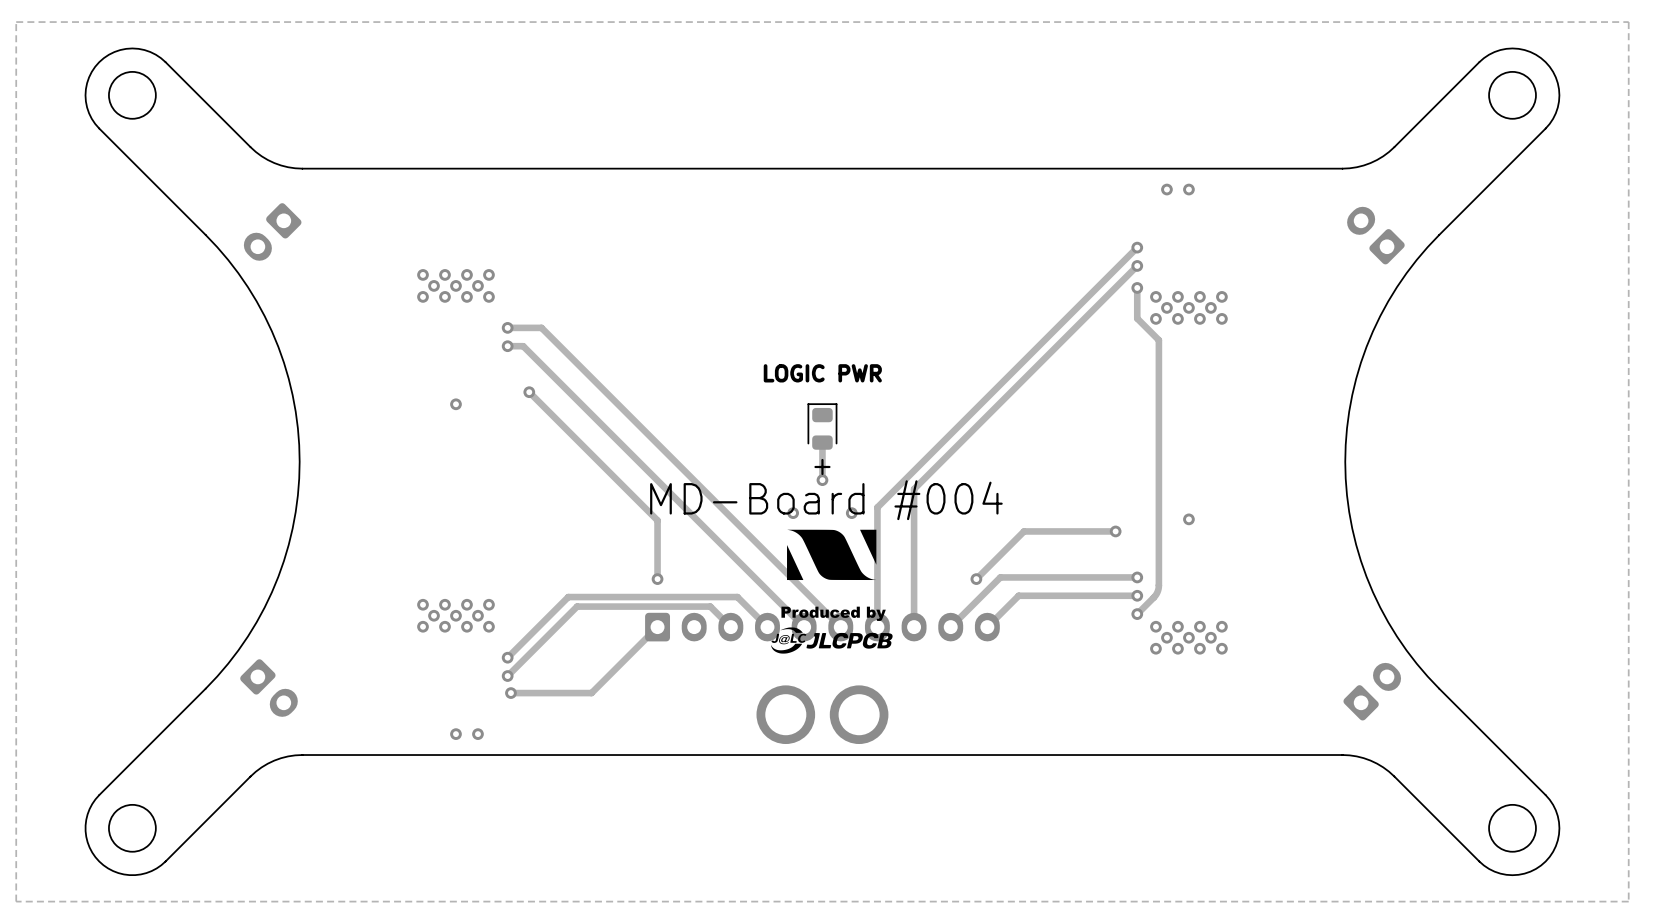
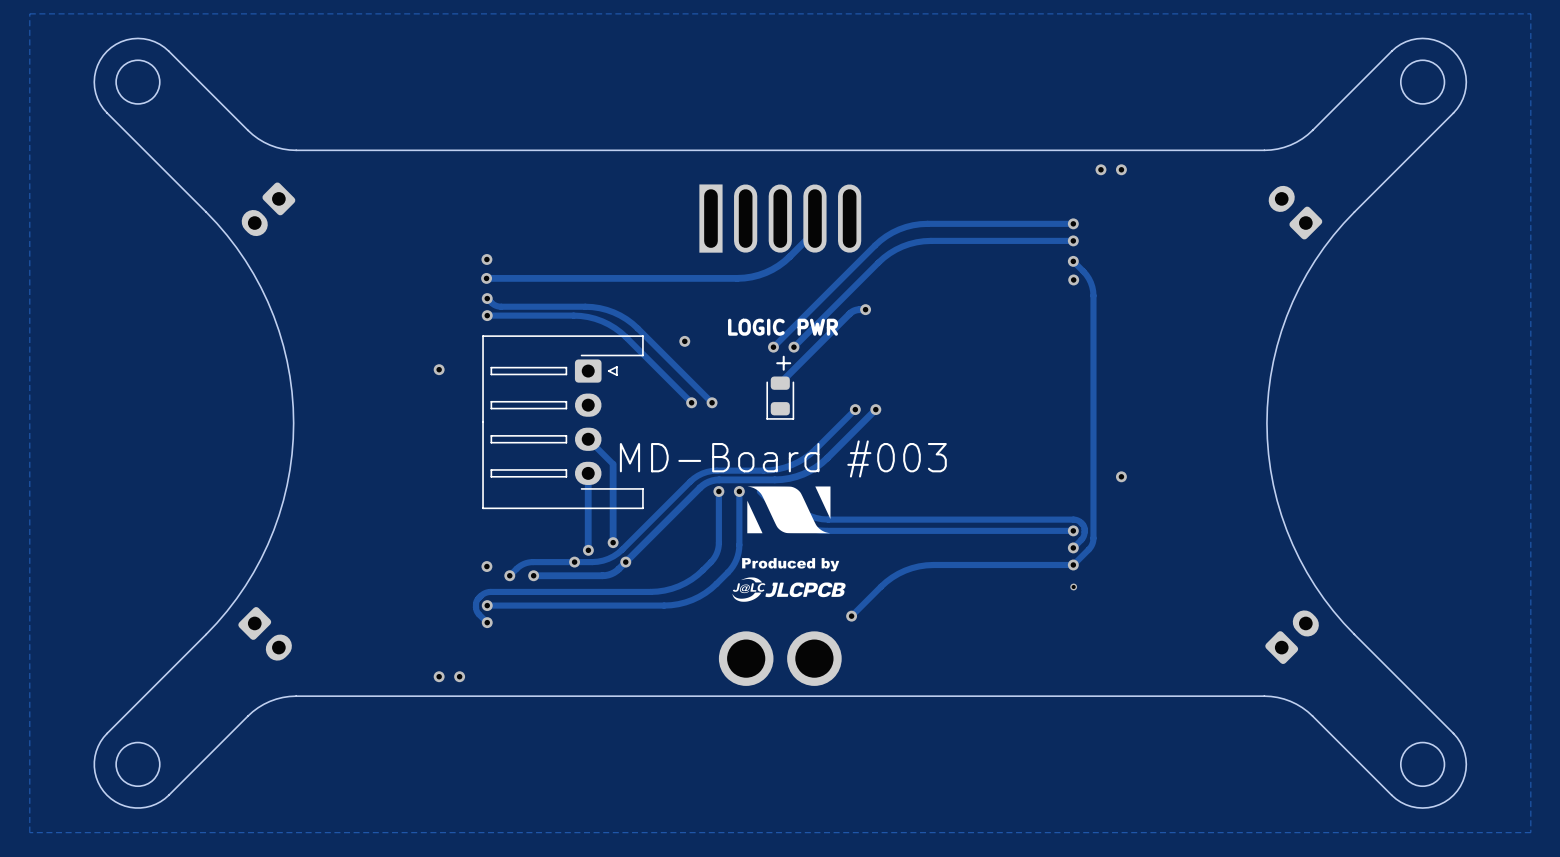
part: none -> (780, 218)
track: none -> (814, 218) (812, 232) (789, 256) (772, 269) (751, 276) (486, 278)
track: (1137, 247) (877, 507) (877, 627) -> (1073, 223) (927, 223) (899, 229) (875, 245) (773, 347)
track: (1137, 265) (914, 489) (914, 627) -> (1073, 240) (930, 240) (902, 246) (878, 262) (793, 347)
via: (423, 274) -> none
via: (444, 274) -> none
via: (466, 274) -> none
via: (488, 274) -> none
via: (433, 285) -> none
via: (455, 285) -> none
via: (477, 285) -> none
via: none -> (486, 259)
track: (1137, 287) (1137, 318) (1158, 340) -> (1073, 261) (1090, 282) (1093, 309)
via: (423, 296) -> none
via: (444, 296) -> none
via: (466, 296) -> none
via: (488, 296) -> none
via: (1155, 296) -> none
via: (1177, 296) -> none
via: (1199, 296) -> none
via: (1221, 296) -> none
via: none -> (486, 278)
via: none -> (1073, 279)
via: (1166, 307) -> none
via: (1188, 307) -> none
via: (1210, 307) -> none
via: (1155, 318) -> none
via: (1177, 318) -> none
via: (1199, 318) -> none
via: (1221, 318) -> none
track: (507, 327) (541, 327) (840, 627) -> (487, 298) (493, 304) (499, 306) (592, 307) (613, 312) (637, 328) (712, 402)
track: none -> (865, 309) (851, 312) (780, 383)
via: none -> (865, 309)
track: (523, 346) (804, 627) -> (501, 315) (580, 315) (602, 321) (626, 337) (691, 402)
via: none -> (684, 341)
text position: LOGIC PWR (822, 373) -> LOGIC PWR (783, 327)
via: none -> (773, 347)
via: none -> (793, 347)
track: (529, 392) (616, 479) -> none
via: (529, 392) -> none
part rotation: 0° (822, 426) -> 180° (780, 398)
via: none -> (691, 402)
via: none -> (712, 402)
track: (822, 442) (822, 480) -> none
track: none -> (855, 409) (804, 458) (785, 467) (763, 470)
via: none -> (855, 409)
track: none -> (875, 409) (821, 463) (803, 474) (782, 479) (719, 479) (705, 483) (618, 568) (611, 573) (602, 575) (533, 575)
via: none -> (875, 409)
part: none -> (562, 422)
text position: + (822, 466) -> + (783, 363)
via: (822, 480) -> none
text: MD-Board #004 (826, 500) -> MD-Board #003 (783, 458)
track: (642, 505) (657, 520) (657, 579) -> (613, 464) (613, 542)
track: none -> (763, 470) (711, 470) (698, 475) (622, 549) (608, 558) (592, 562) (528, 562) (520, 566) (509, 575)
via: (793, 513) -> none
via: (851, 513) -> none
track: none -> (588, 473) (588, 550)
track: (1115, 531) (1024, 531) (976, 579) -> none
via: (1115, 531) -> none
via: none -> (718, 491)
via: none -> (739, 491)
track: (1000, 577) (950, 627) -> (945, 530) (813, 529) (789, 519) (759, 491)
via: (657, 579) -> none
via: (976, 579) -> none
via: none -> (613, 542)
track: (1137, 595) (1018, 595) (987, 627) -> (1073, 547) (1082, 538) (1084, 533) (1083, 525) (1075, 519) (822, 519) (804, 513) (780, 491)
via: none -> (588, 550)
via: (423, 604) -> none
via: (444, 604) -> none
via: (466, 604) -> none
via: (488, 604) -> none
via: none -> (574, 562)
via: none -> (625, 562)
track: none -> (1073, 564) (919, 566) (892, 577) (851, 616)
via: (433, 615) -> none
via: (455, 615) -> none
via: (477, 615) -> none
via: none -> (486, 566)
via: none -> (509, 575)
via: none -> (533, 575)
via: (423, 626) -> none
via: (444, 626) -> none
via: (466, 626) -> none
via: (488, 626) -> none
via: (1155, 626) -> none
via: (1177, 626) -> none
via: (1199, 626) -> none
via: (1221, 626) -> none
track: (657, 627) (591, 693) (510, 693) -> none
track: (730, 627) (710, 606) (577, 606) (507, 676) -> (718, 491) (718, 542) (716, 553) (702, 570) (685, 583) (664, 590) (650, 591) (488, 592) (478, 598) (475, 604) (477, 612) (487, 622)
track: (767, 627) (737, 597) (568, 597) (507, 657) -> (739, 491) (739, 544) (736, 559) (730, 569) (716, 583) (692, 599) (664, 605) (487, 605)
part: (822, 627) -> none
via: none -> (1073, 586)
via: (1166, 637) -> none
via: (1188, 637) -> none
via: (1210, 637) -> none
via: (1155, 648) -> none
via: (1177, 648) -> none
via: (1199, 648) -> none
via: (1221, 648) -> none
via: none -> (851, 616)
via: (510, 693) -> none

